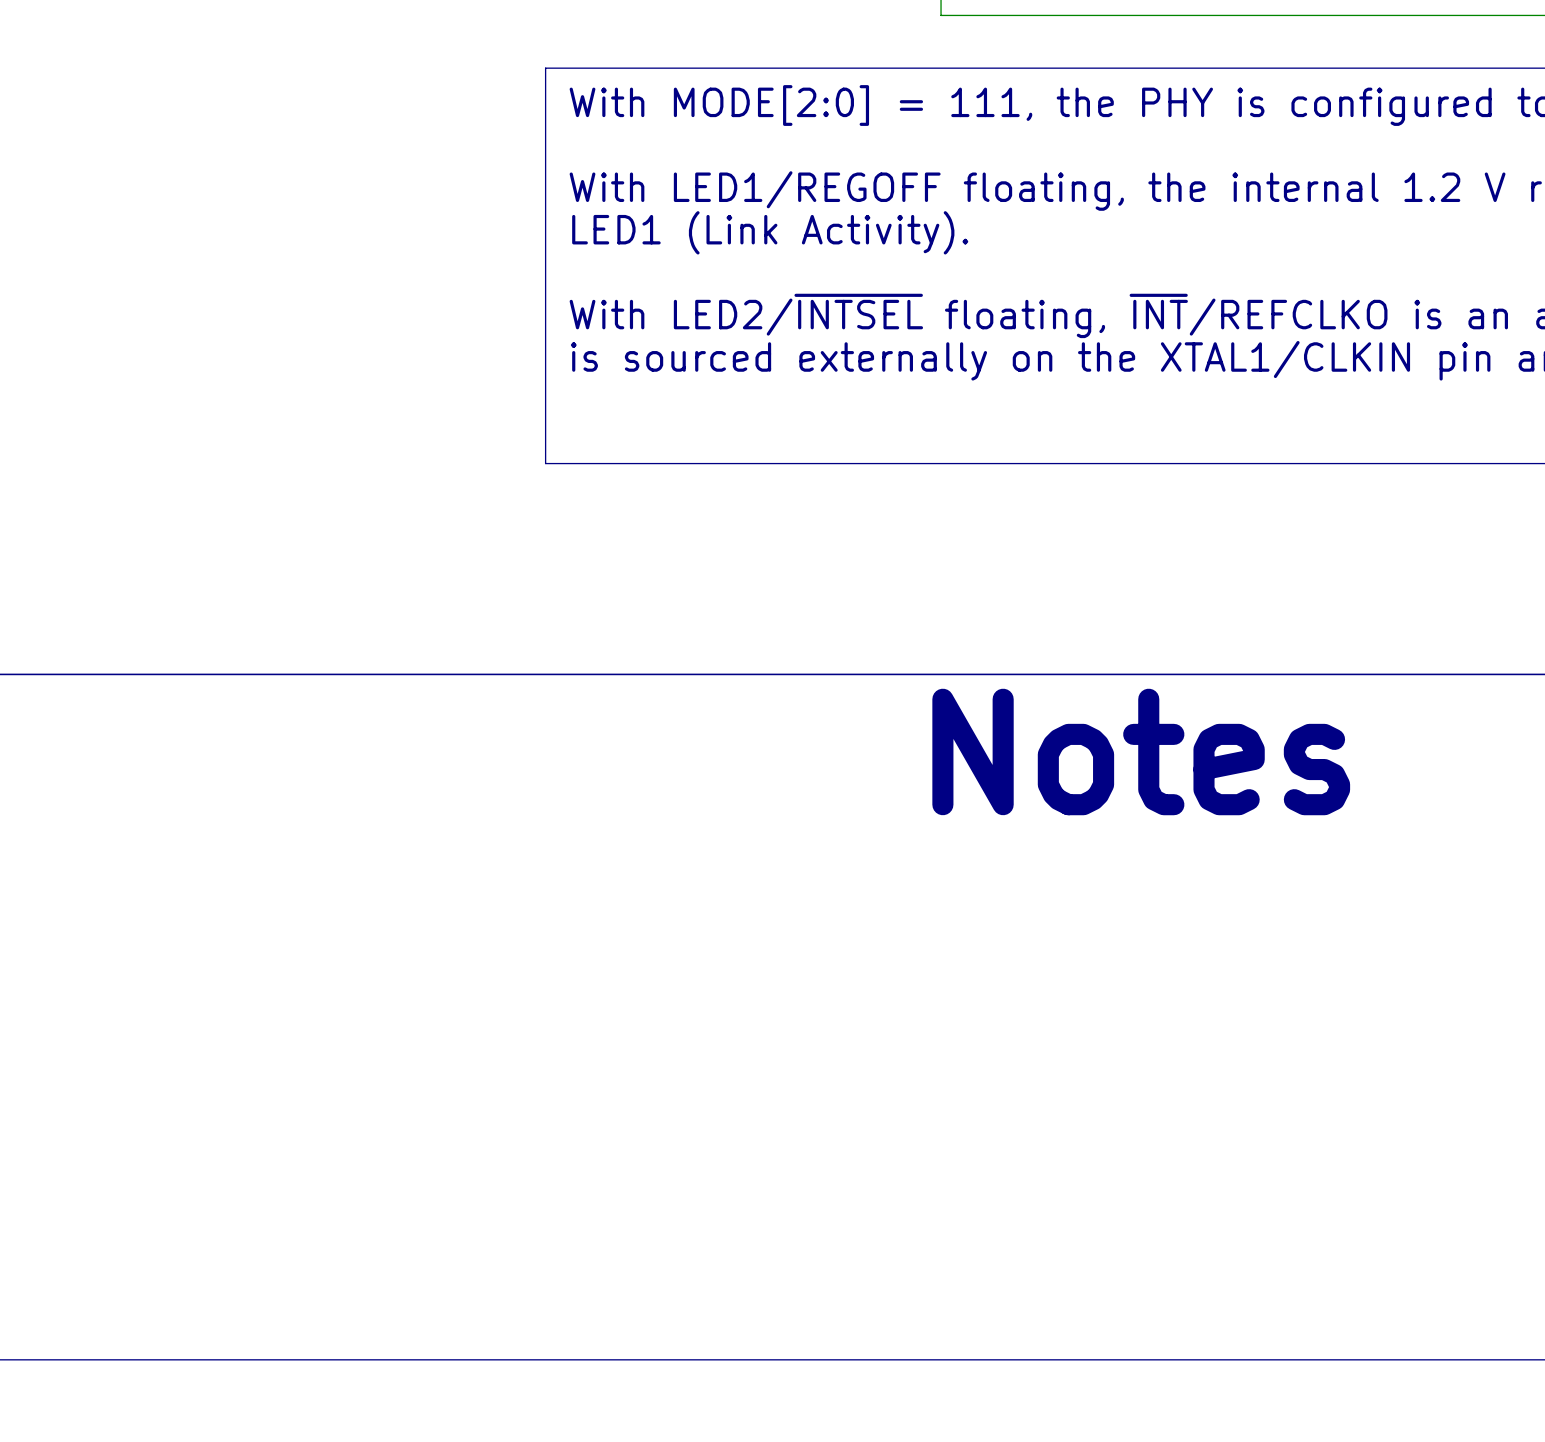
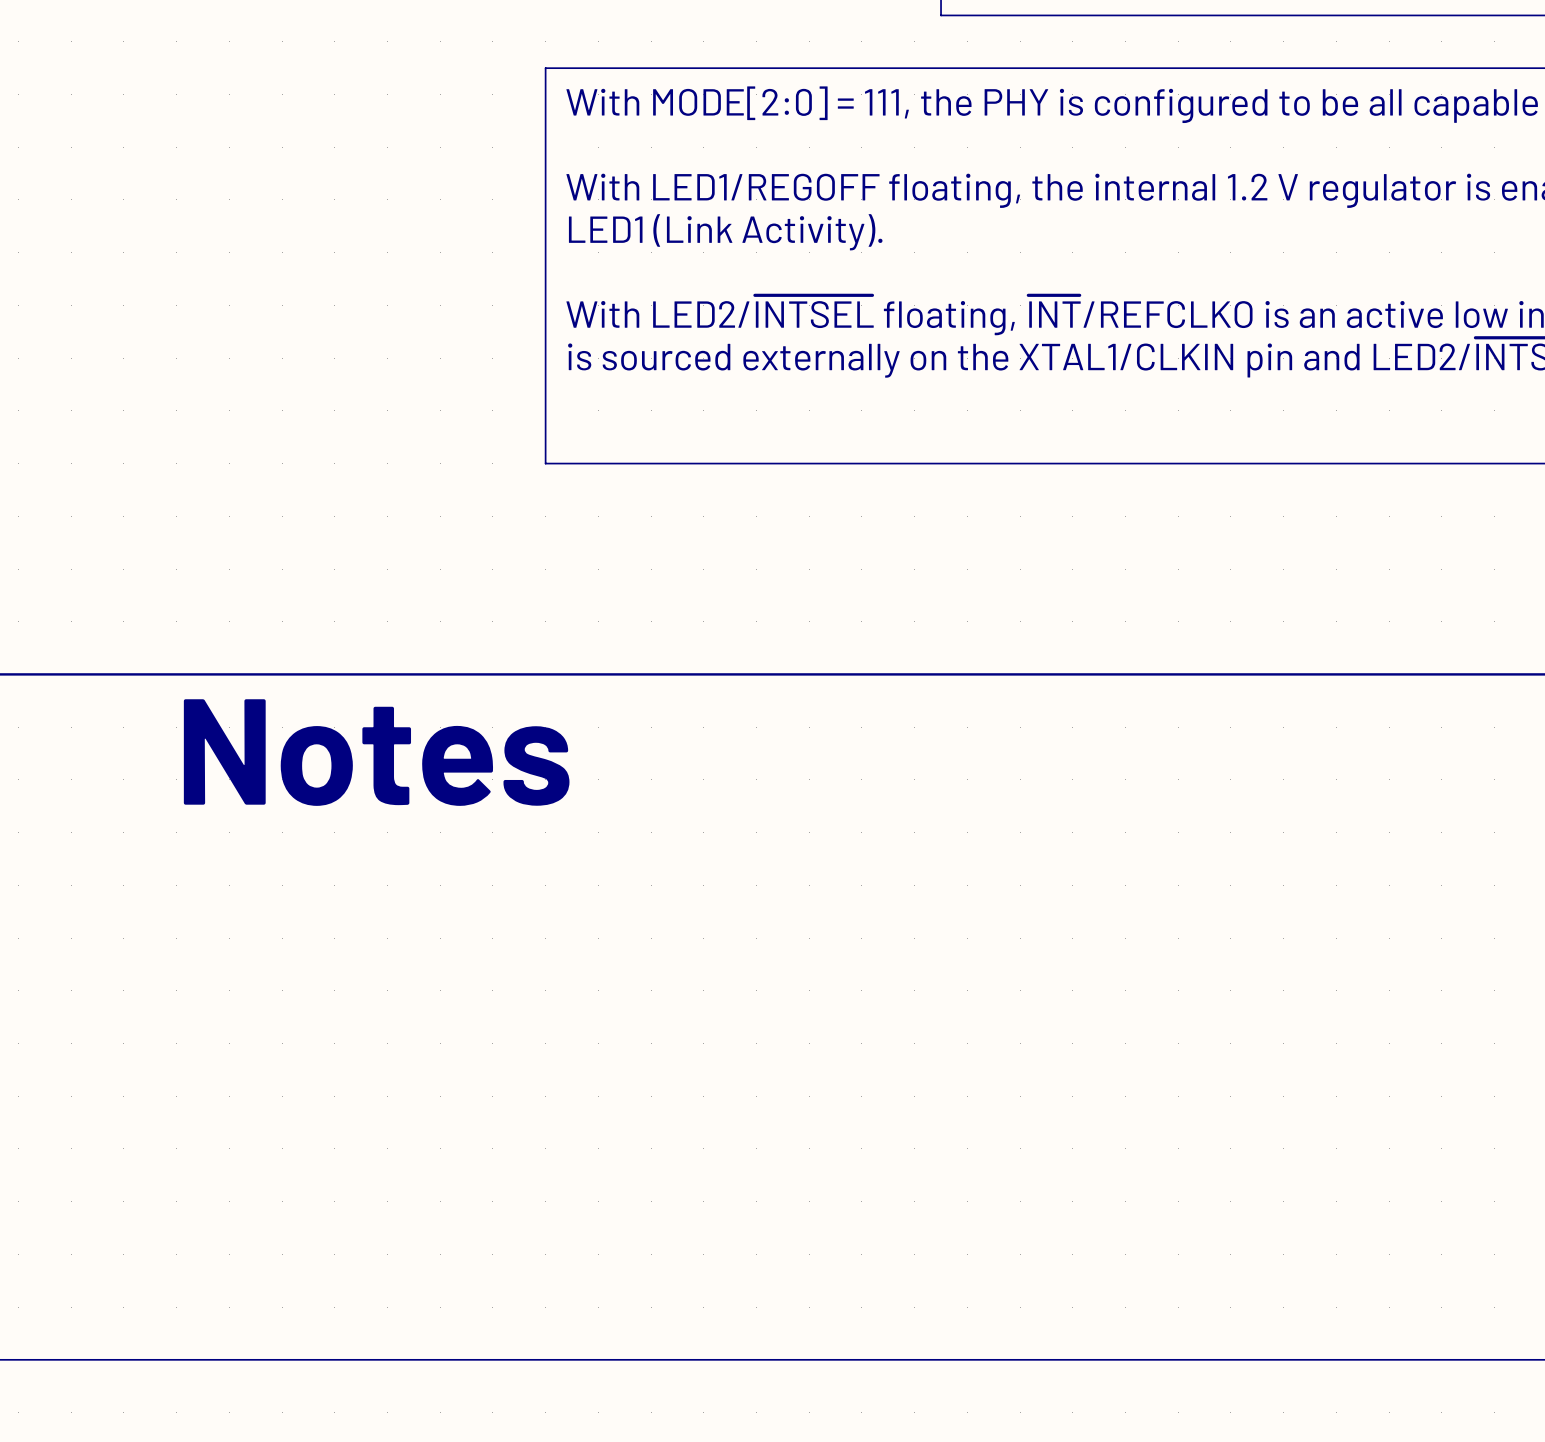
text: none -> Notes (376, 752)
text: Notes (1141, 751) -> none

